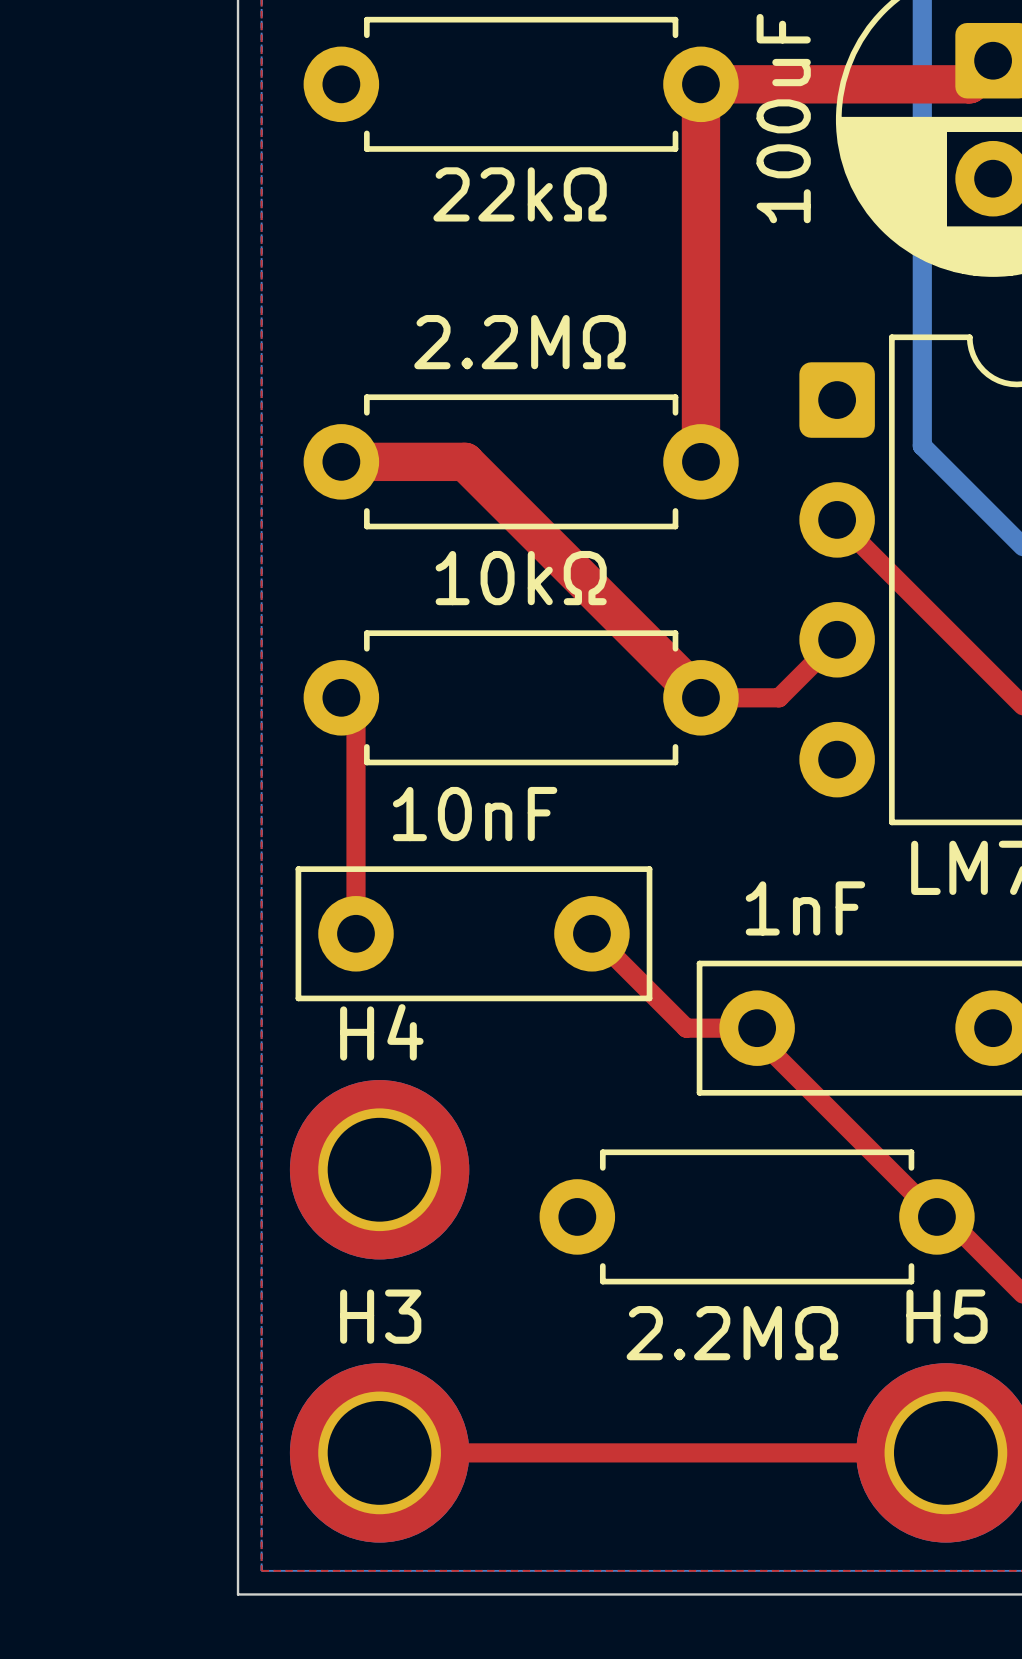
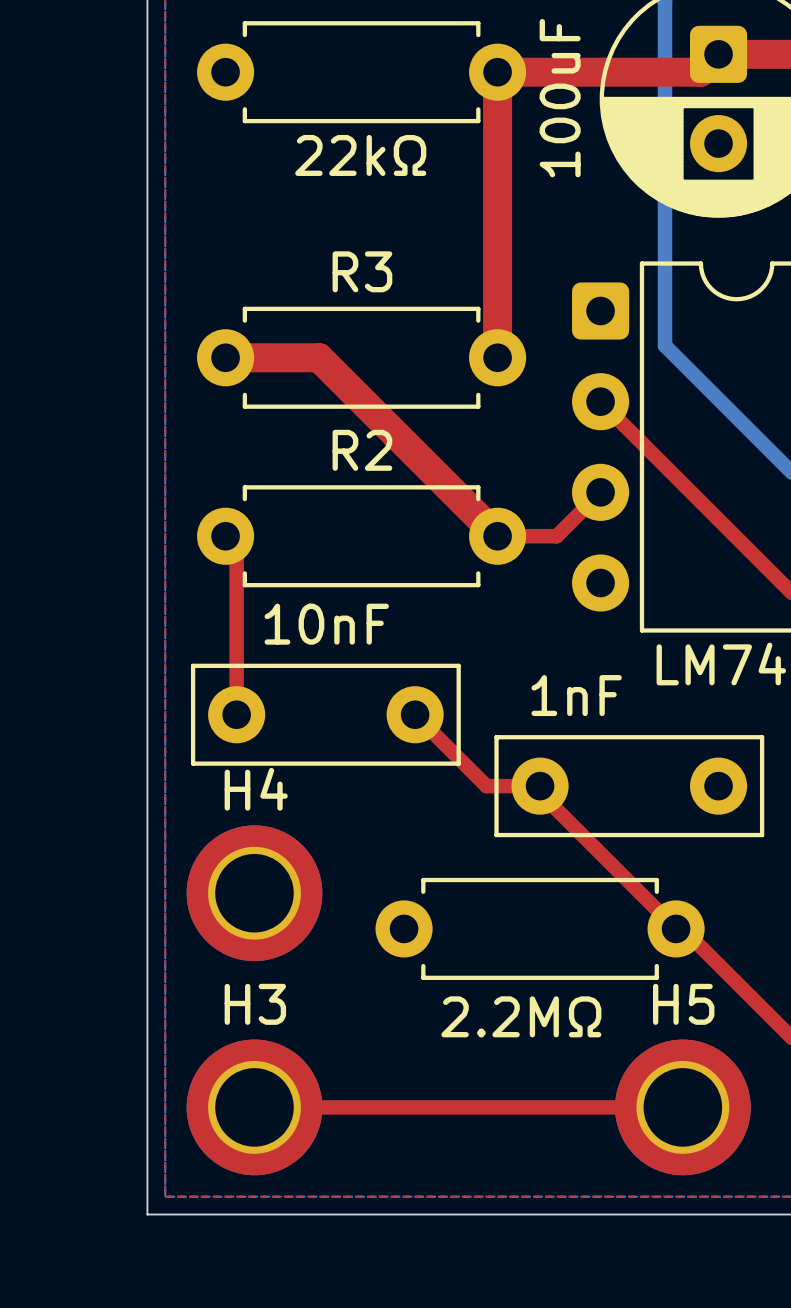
R3 value: 2.2MΩ (520, 342) -> none
R3 name: none -> R3 (362, 271)
R2 value: 10kΩ (521, 578) -> none
R2 name: none -> R2 (362, 450)

